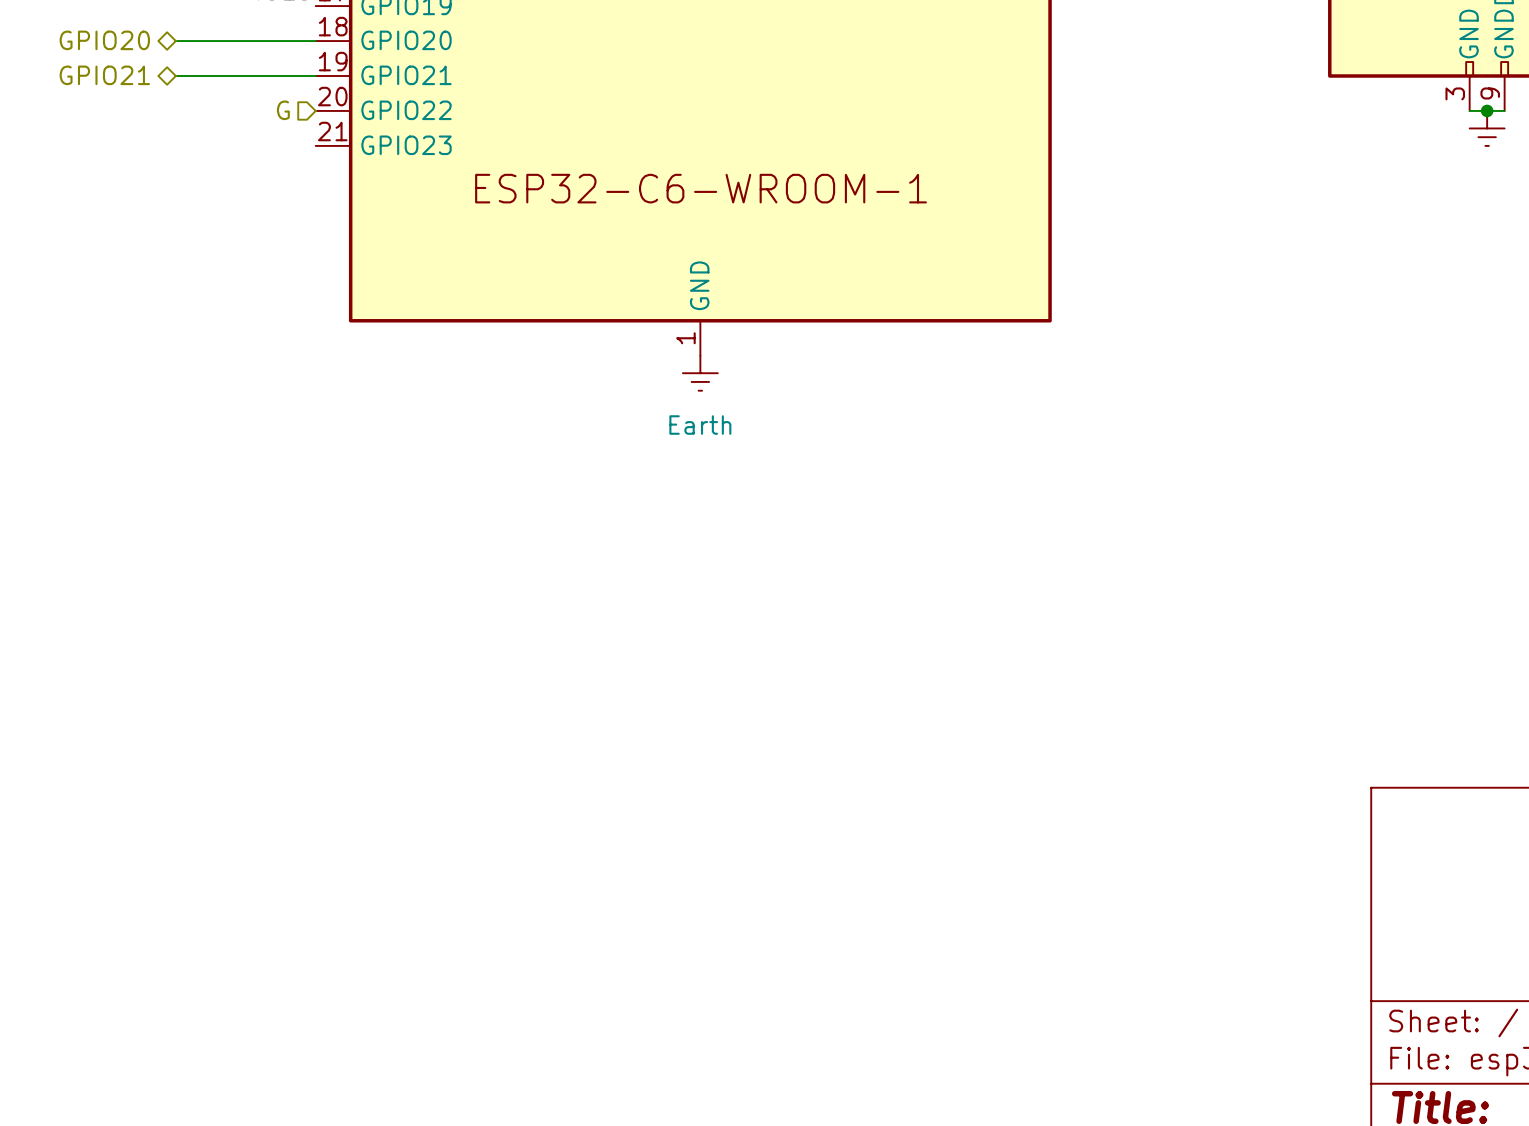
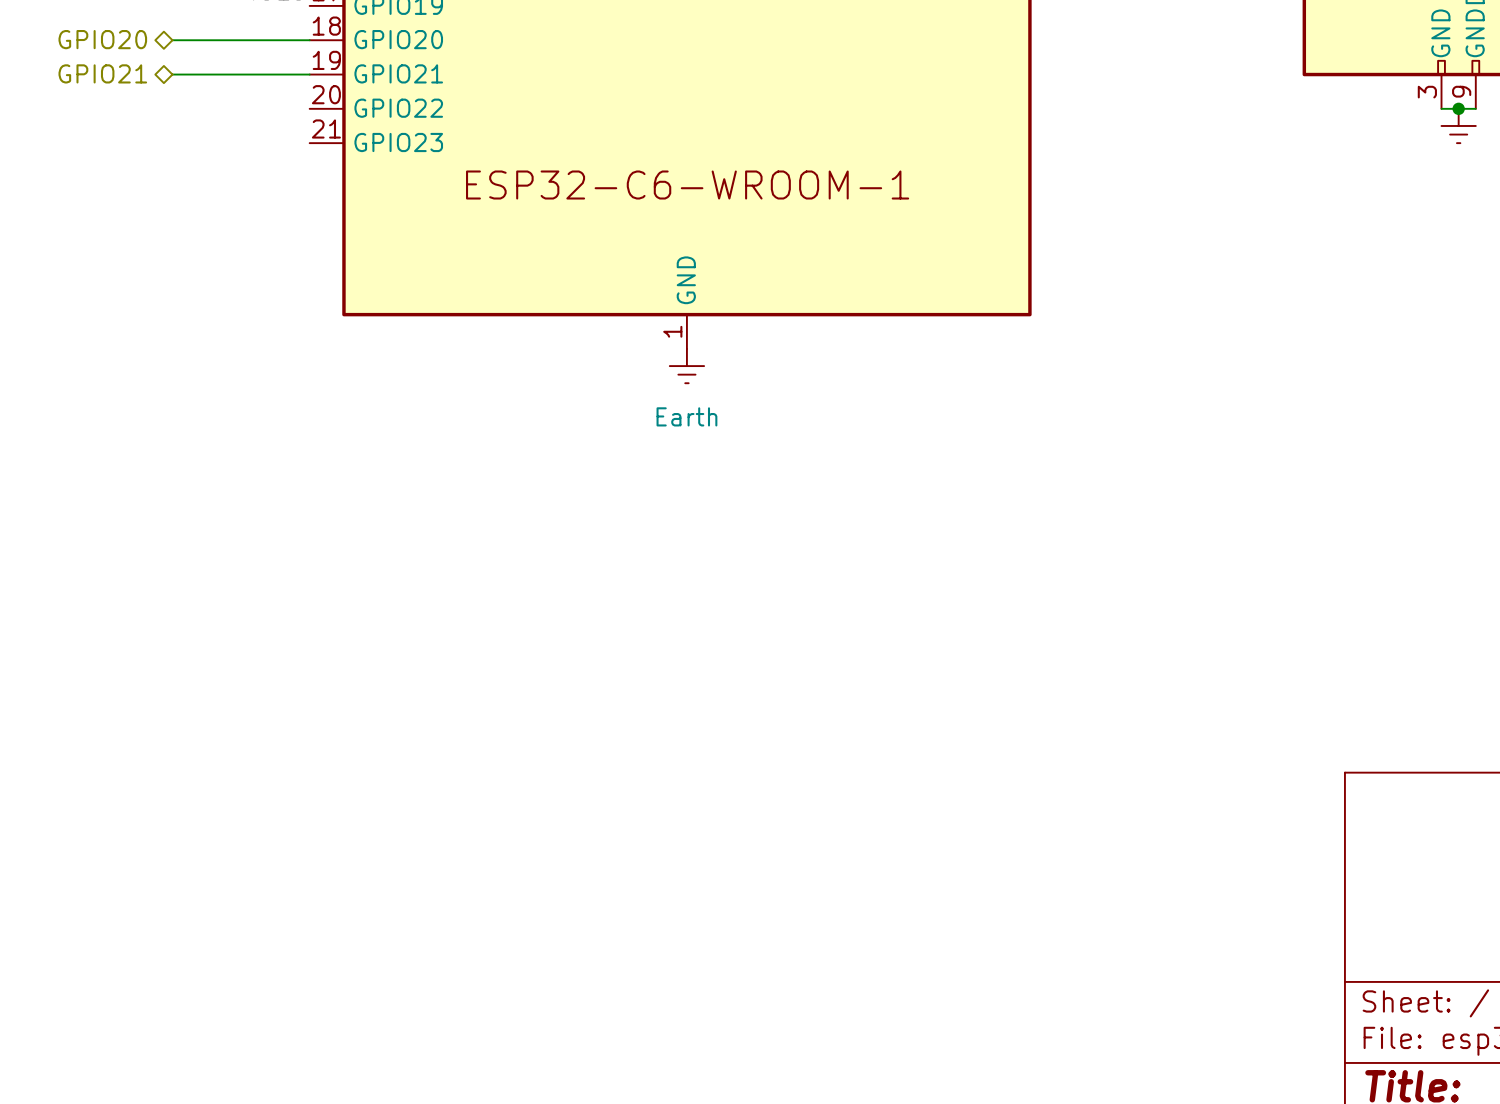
hierarchical label: G (283, 110) -> none

